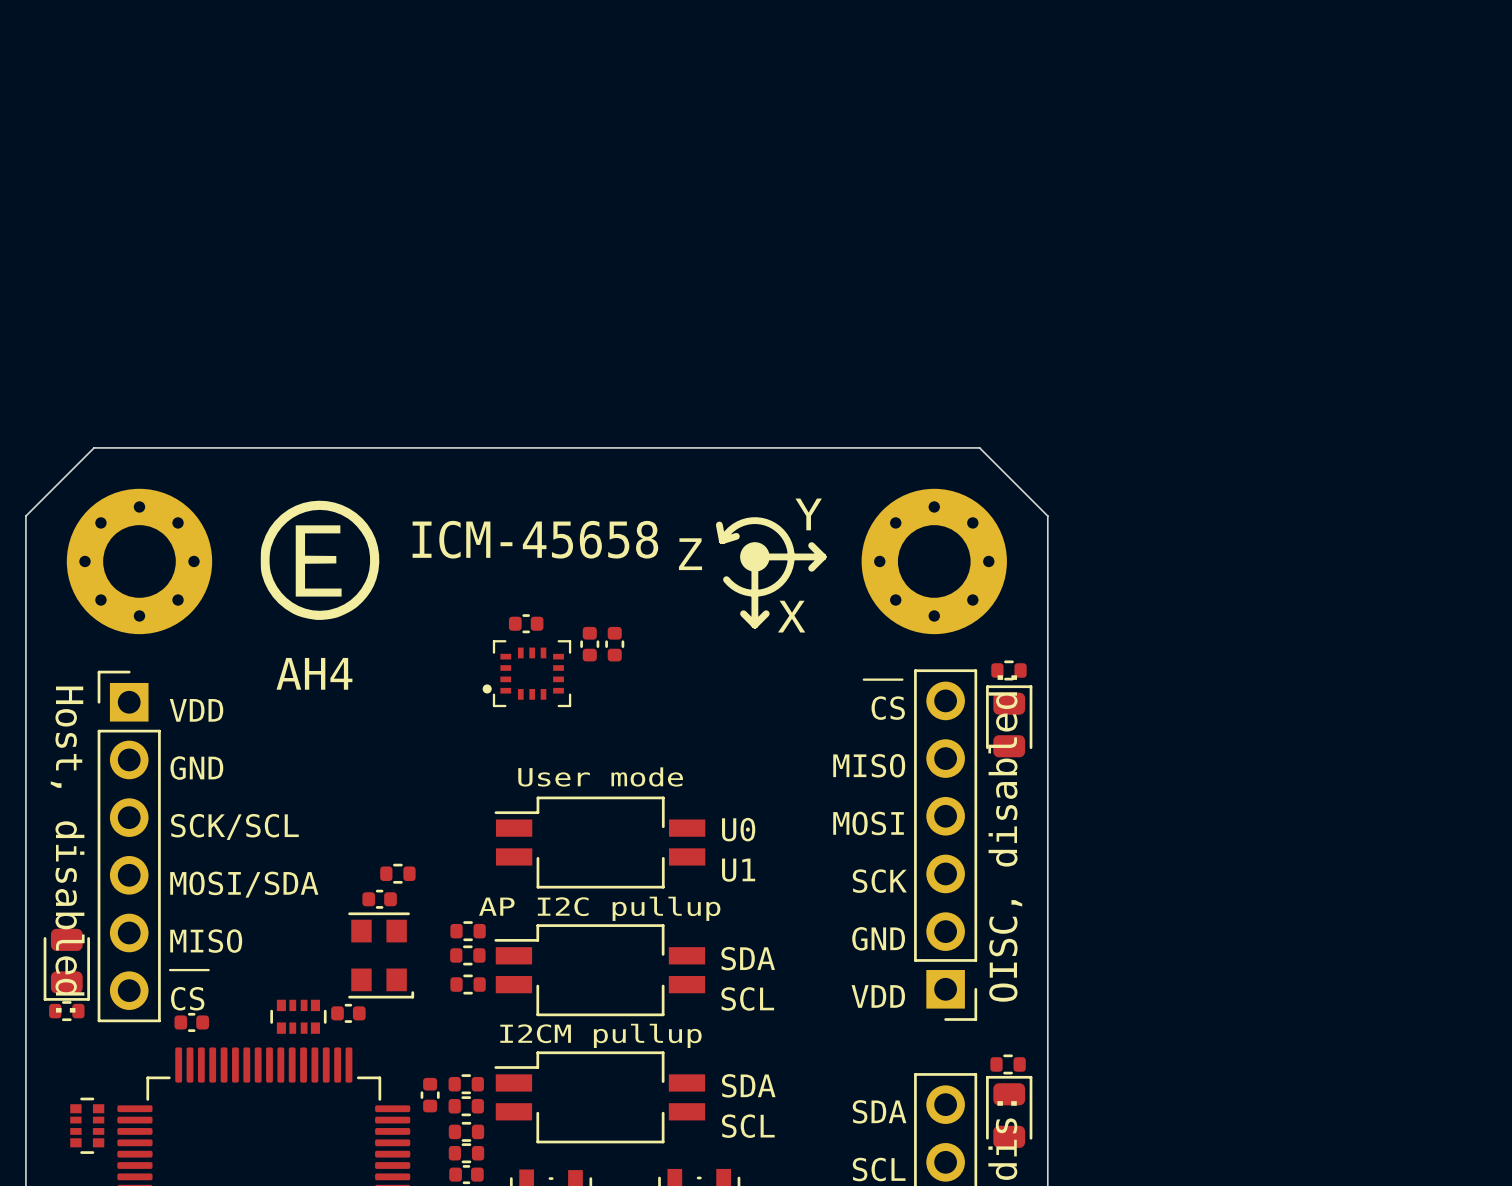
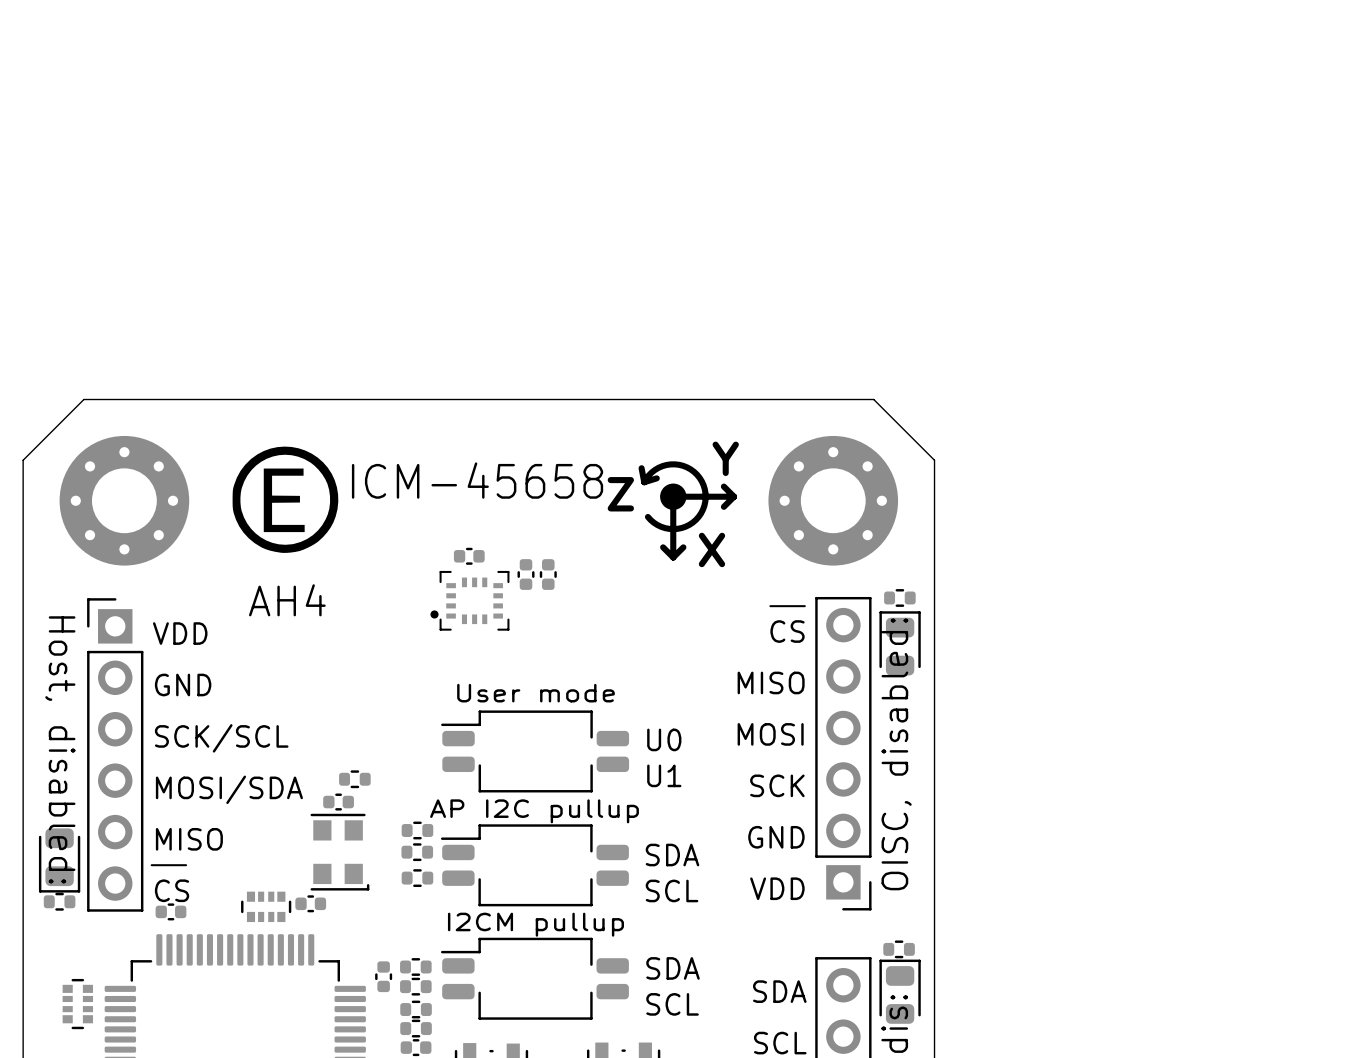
part footprint: [494, 796, 706, 889] -> [441, 710, 630, 793]
part footprint: [494, 924, 706, 1017] -> [440, 824, 629, 907]
part footprint: [494, 1051, 706, 1144] -> [440, 937, 629, 1020]

